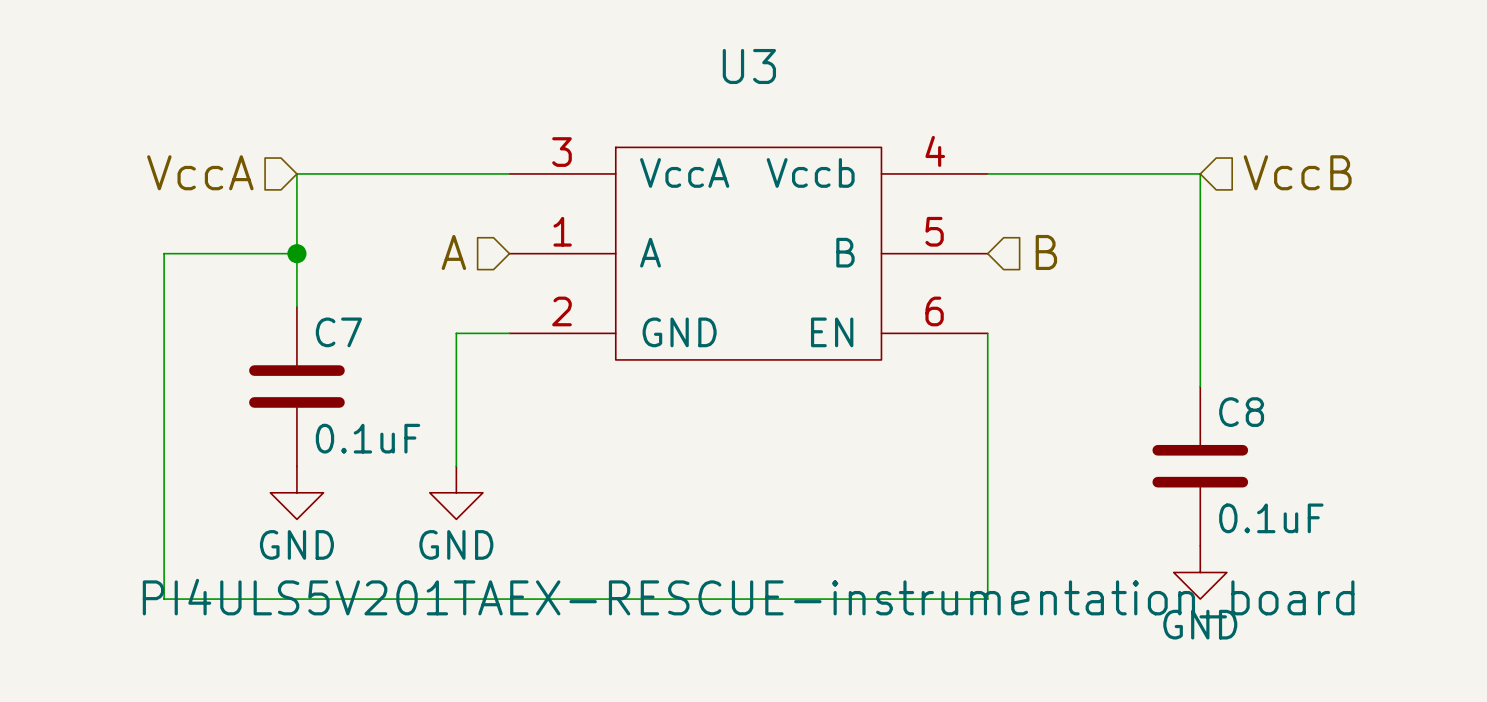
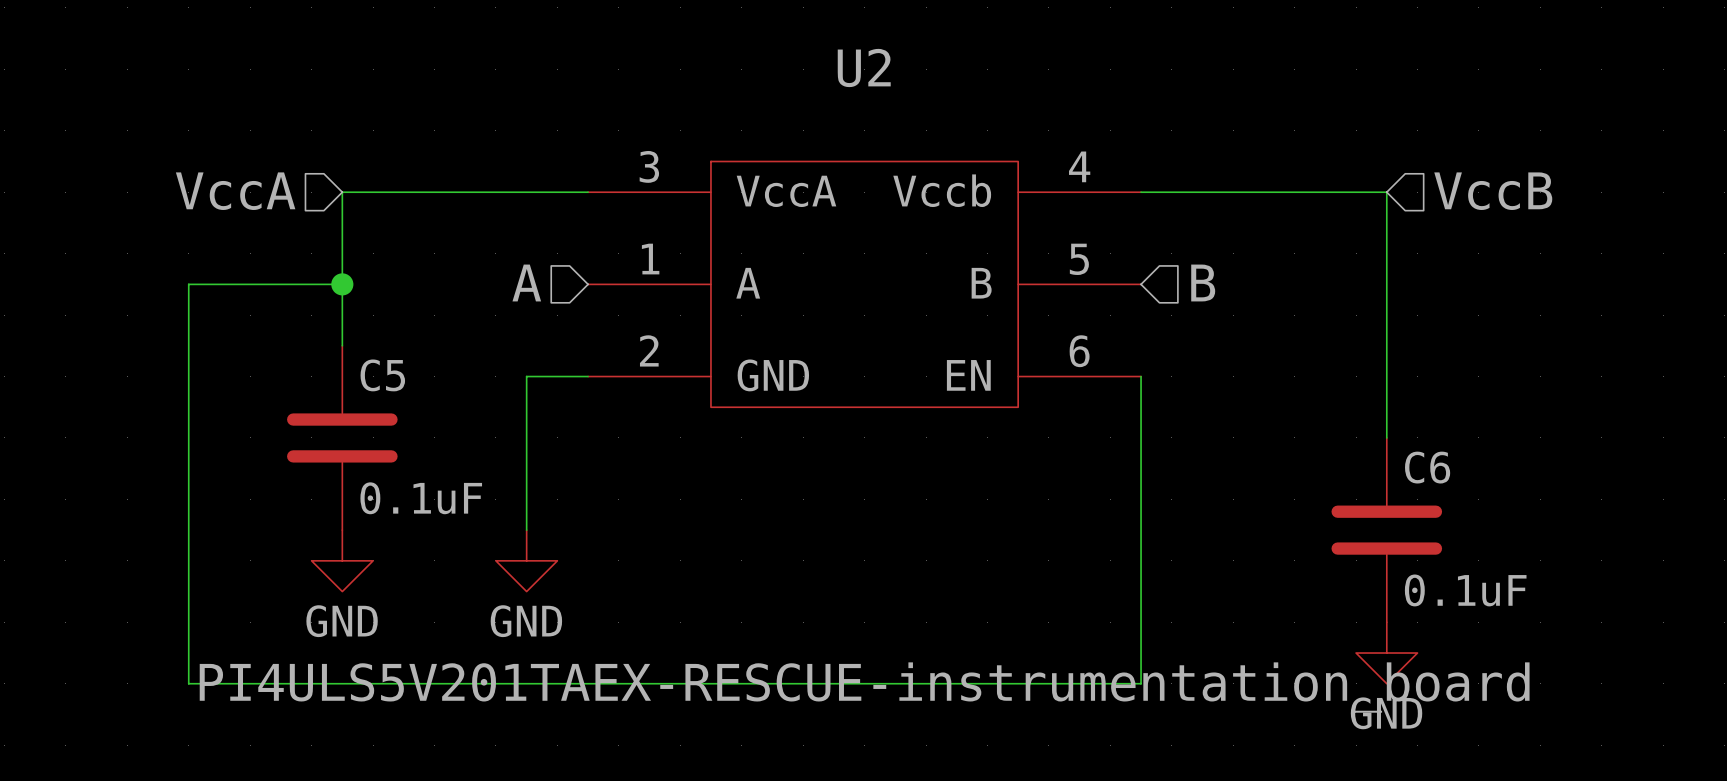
U3 name: U3 (749, 66) -> U2 (864, 67)
C7 name: C7 (338, 332) -> C5 (382, 375)
C8 name: C8 (1241, 412) -> C6 (1427, 467)

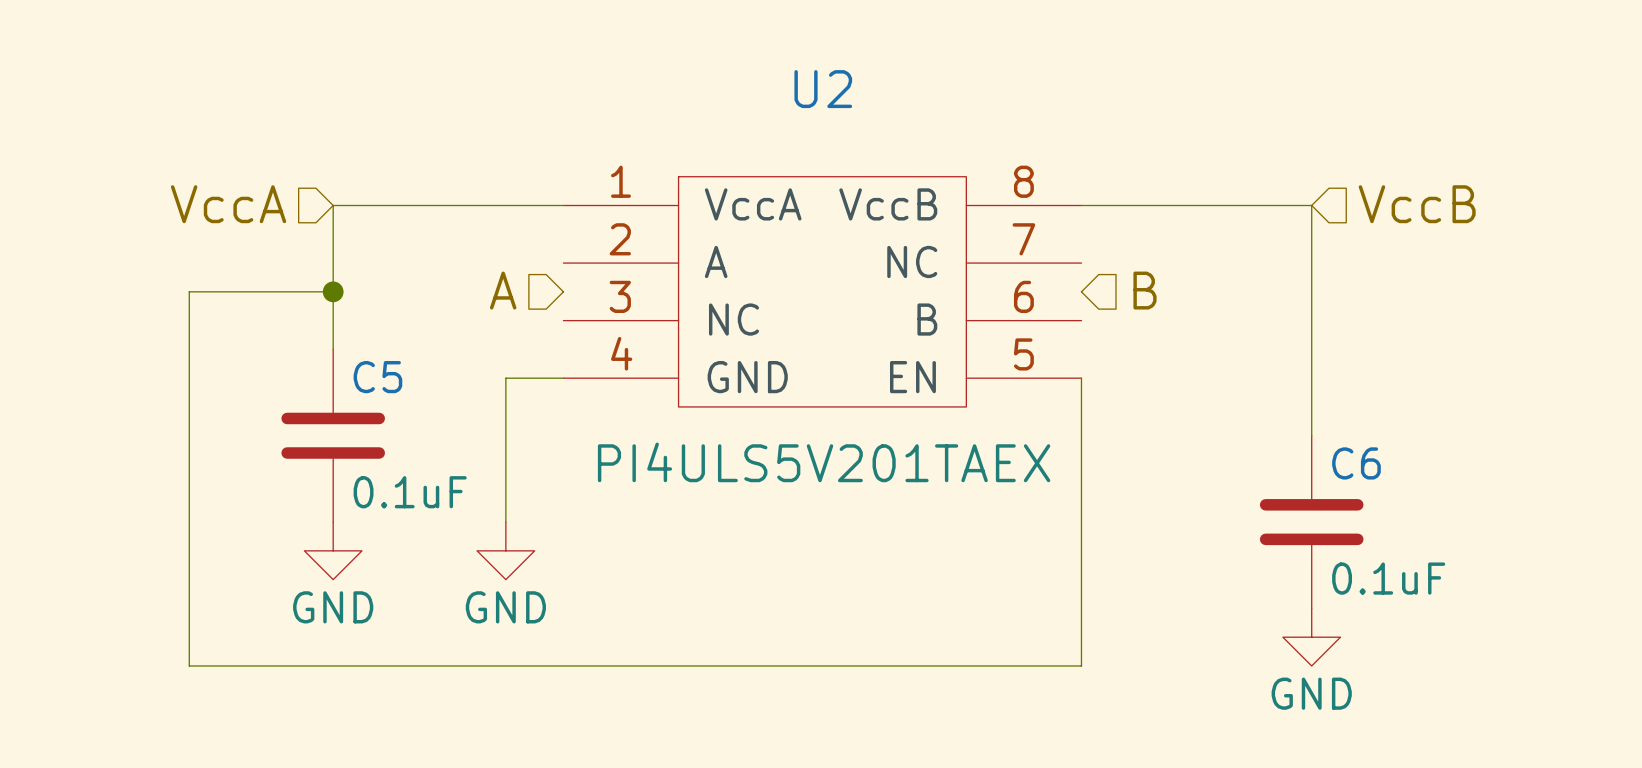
U2 symbol: [588, 161, 1142, 408] -> [563, 176, 1082, 407]
U2 value: PI4ULS5V201TAEX-RESCUE-instrumentation_board (864, 687) -> PI4ULS5V201TAEX (824, 462)

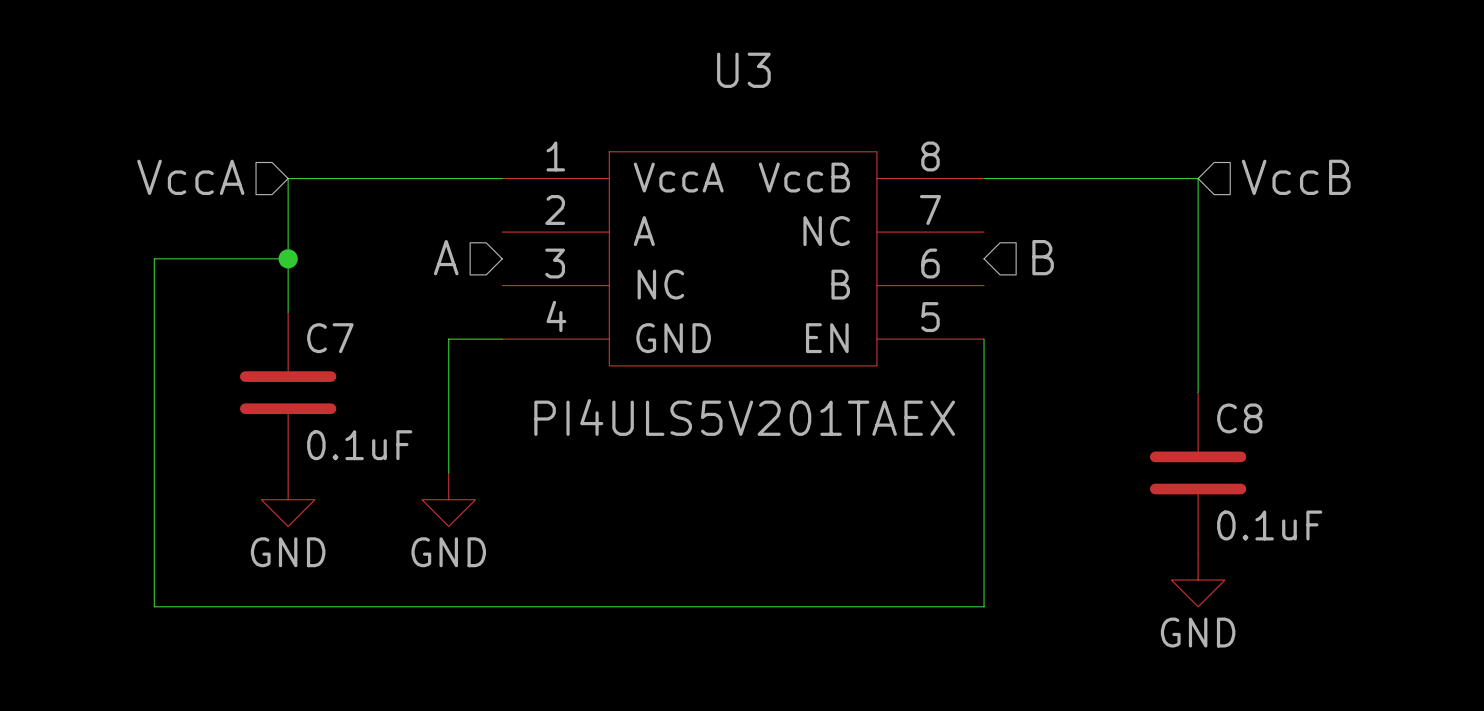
U2 name: U2 (823, 89) -> U3 (743, 70)
C5 name: C5 (377, 377) -> C7 (330, 338)
C6 name: C6 (1356, 463) -> C8 (1239, 418)

